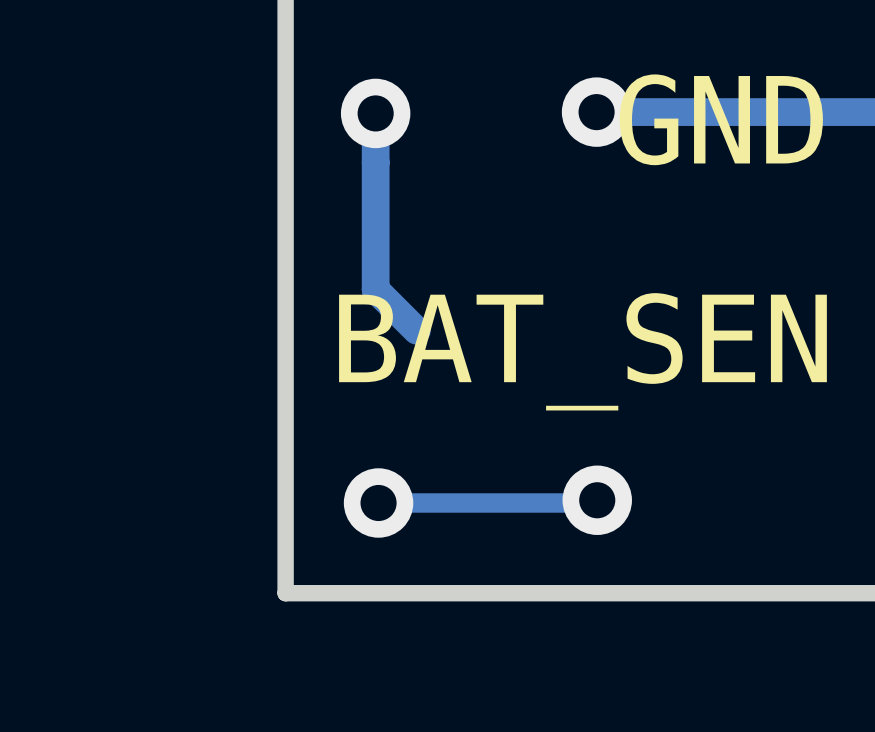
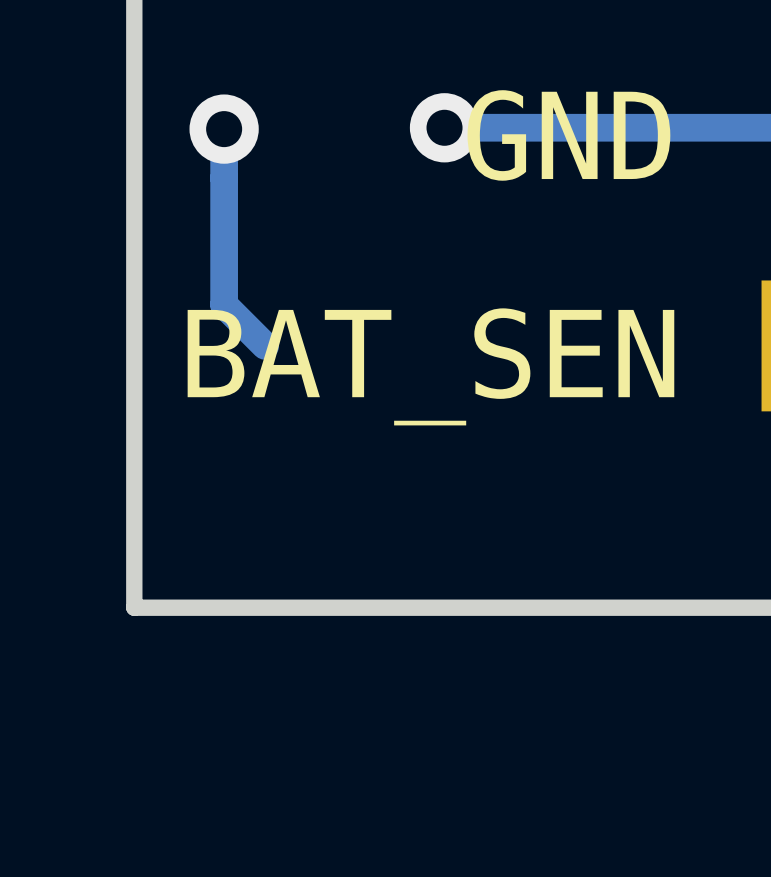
track: (597, 500) (594, 502) (378, 502) -> none
via: (597, 500) -> none
via: (378, 502) -> none

